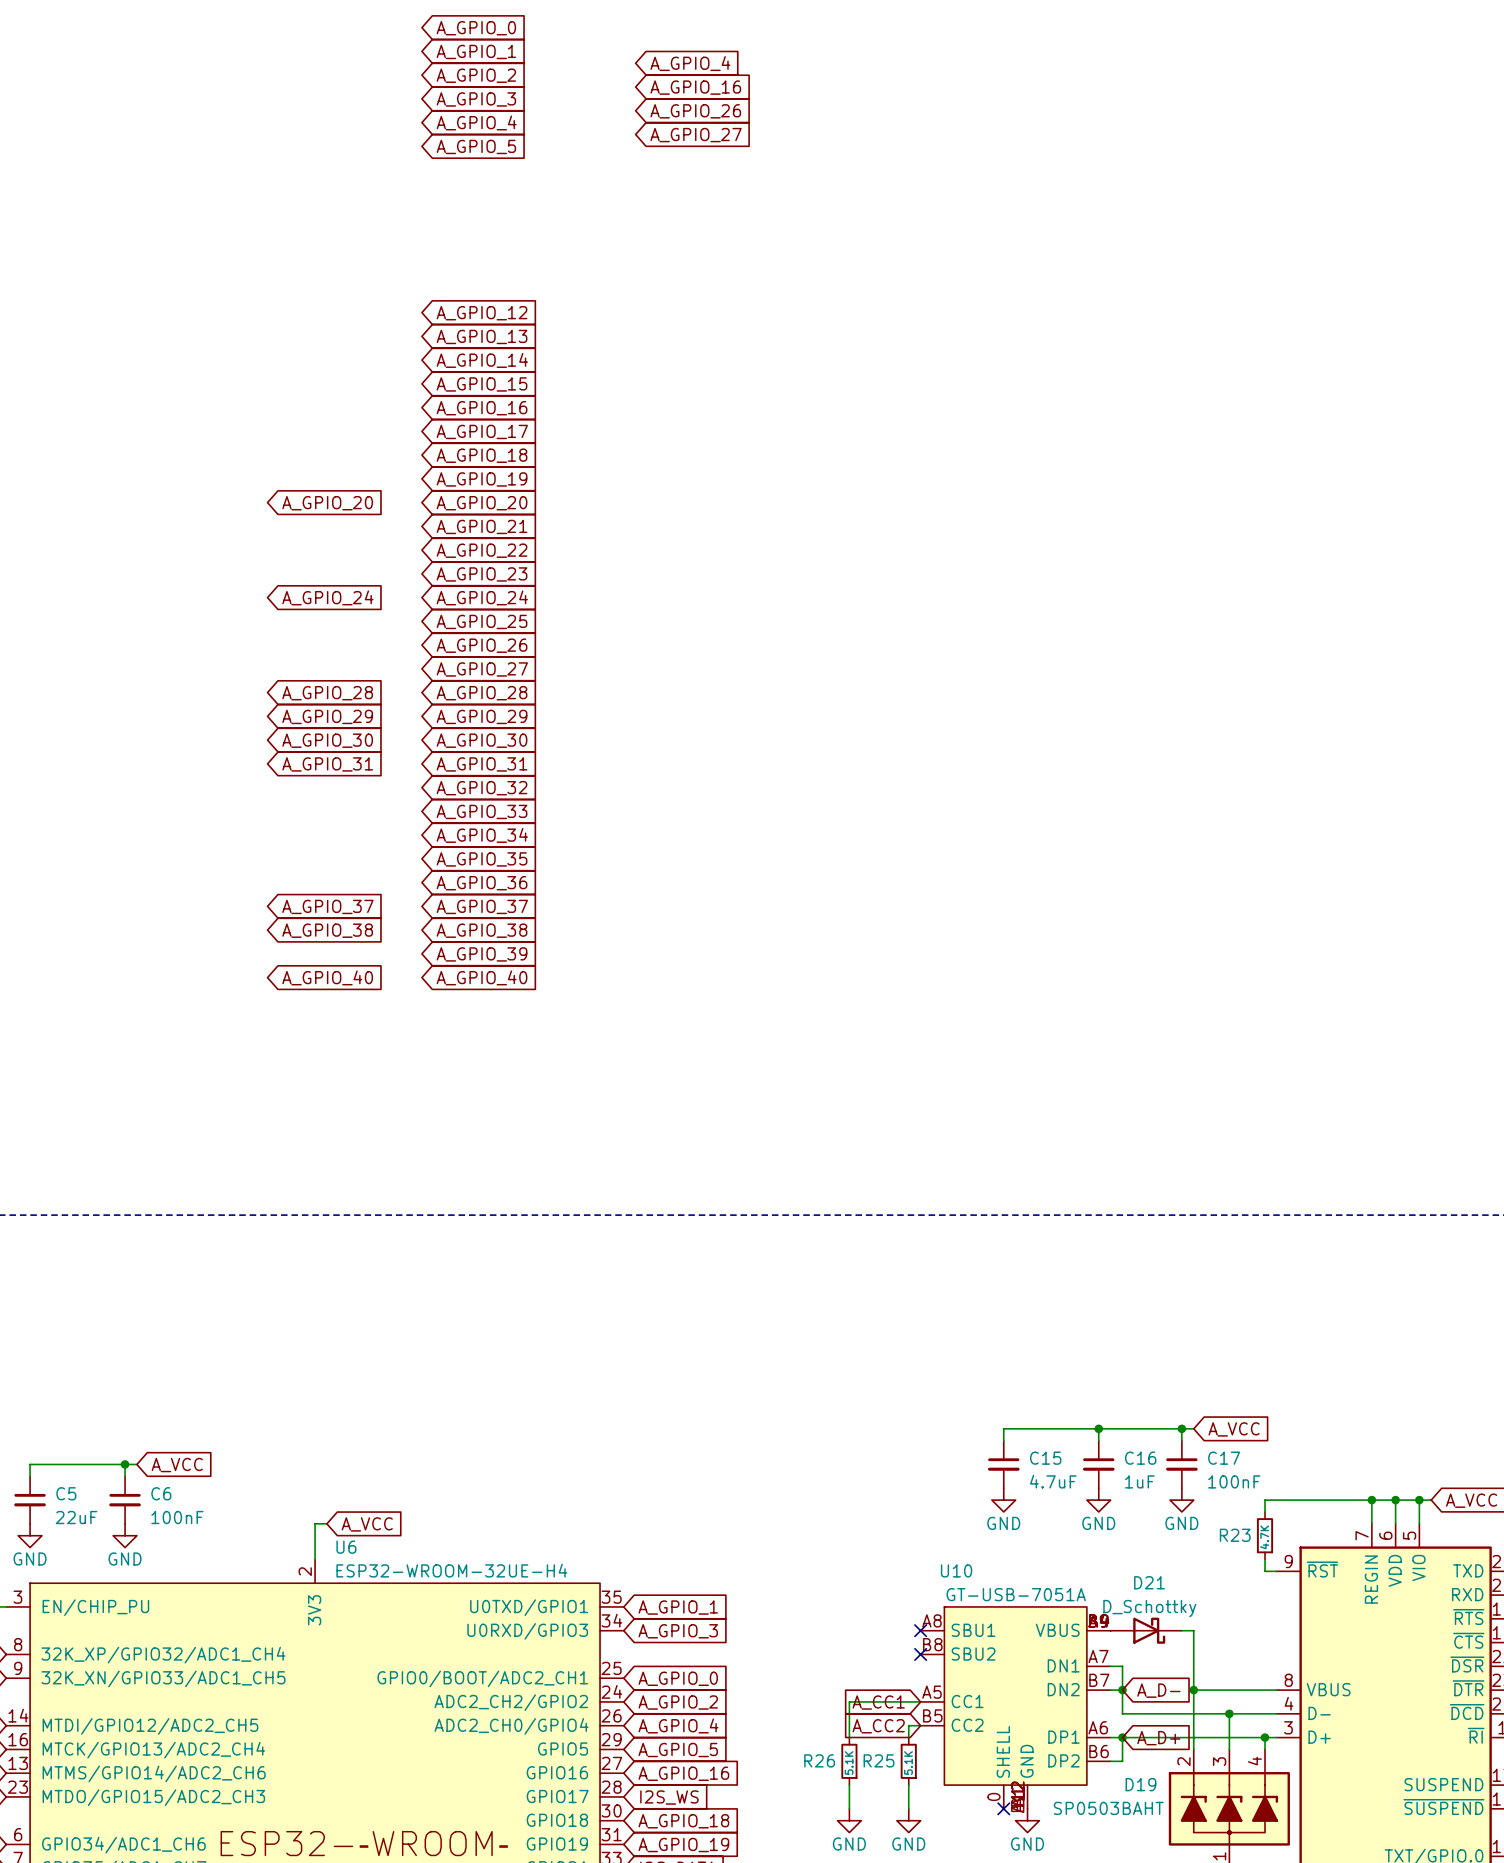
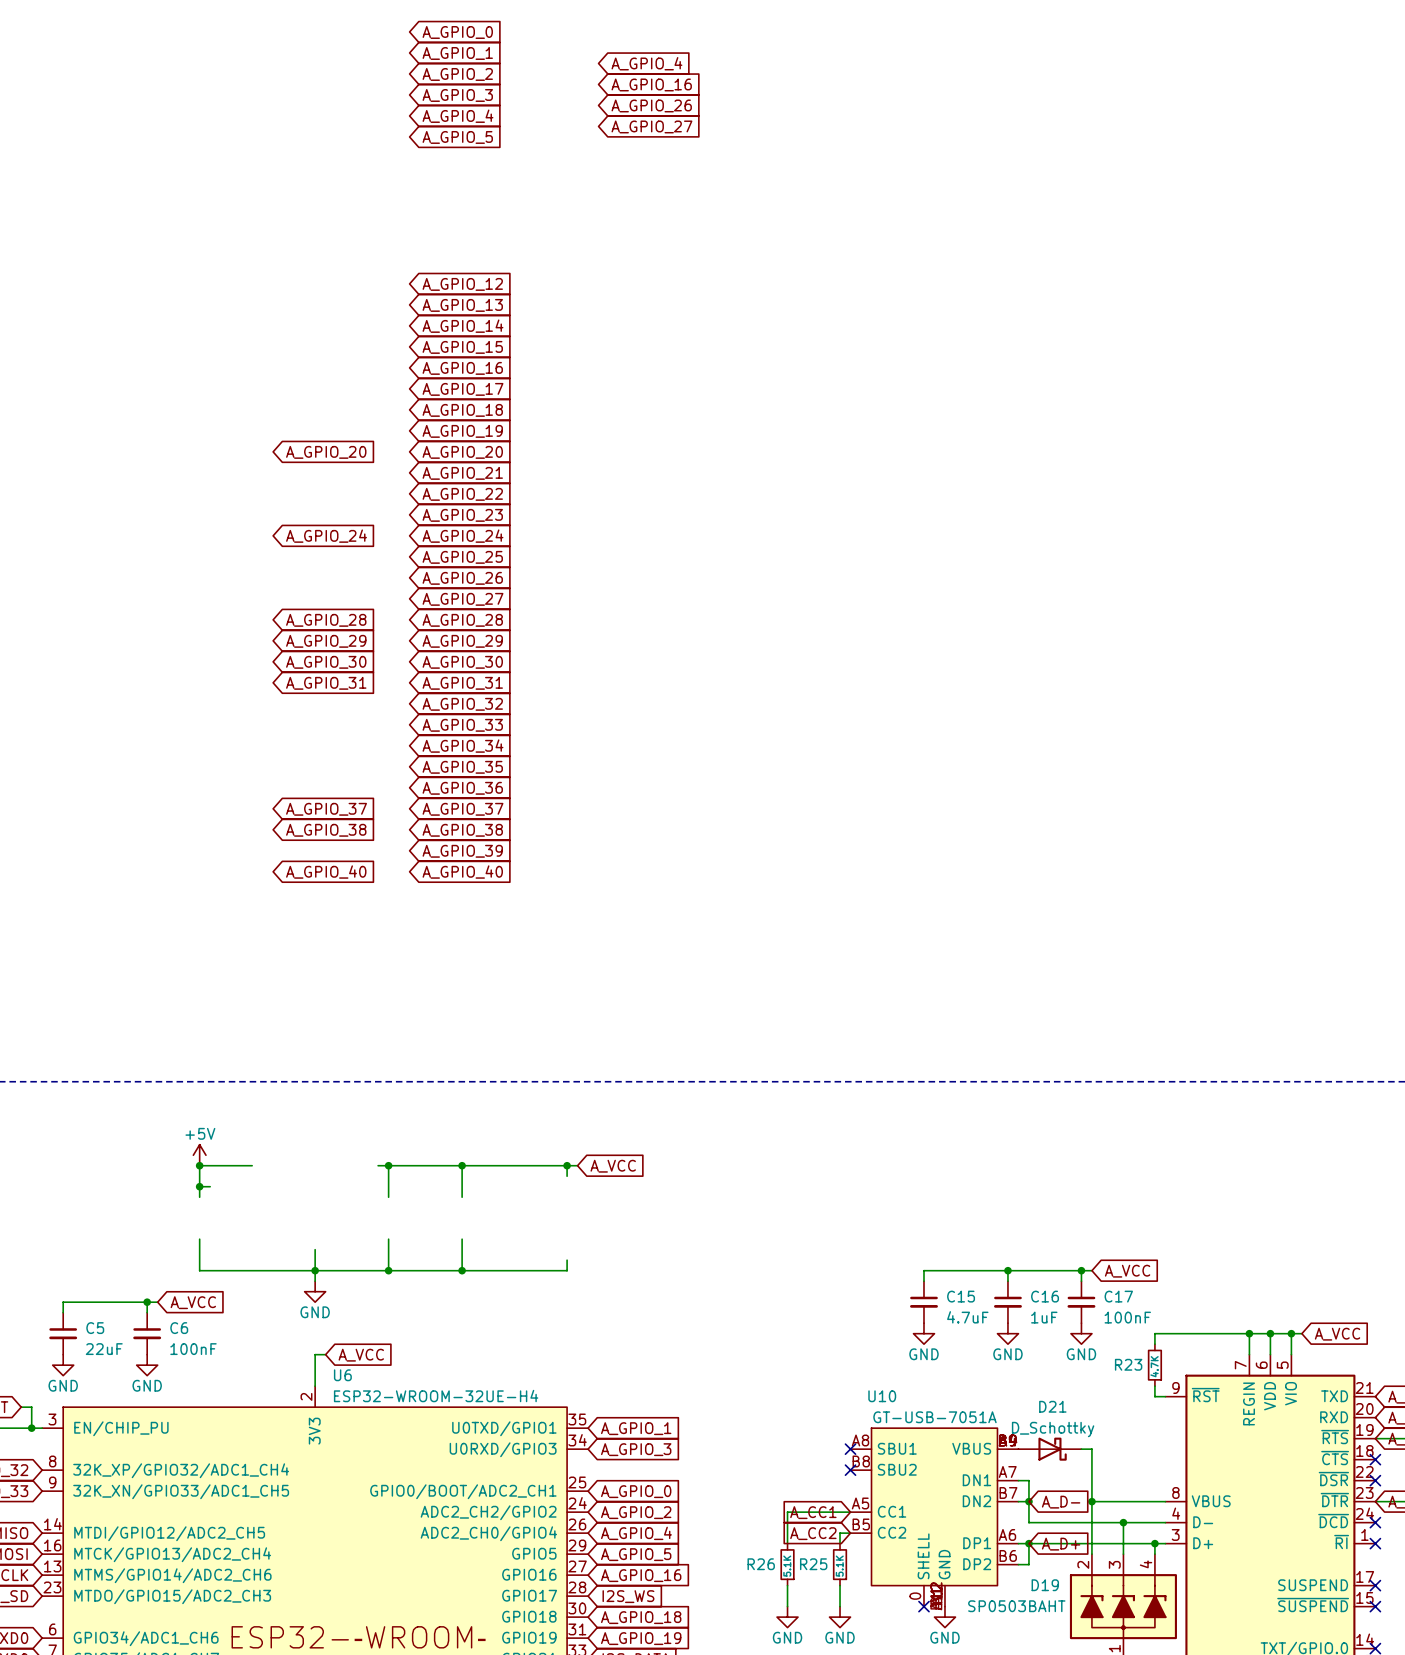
power symbol: none -> +5V (199, 1155)
junction: none -> (199, 1165)
wire: none -> (252, 1165) (199, 1165) (199, 1197)
wire: none -> (378, 1165) (577, 1165)
wire: none -> (388, 1165) (388, 1197)
junction: none -> (388, 1165)
wire: none -> (462, 1165) (462, 1197)
junction: none -> (462, 1165)
wire: none -> (567, 1165) (567, 1176)
junction: none -> (567, 1165)
global label: none -> A_VCC (613, 1166)
wire: none -> (199, 1186) (210, 1186)
junction: none -> (199, 1186)
wire: none -> (199, 1239) (199, 1270) (567, 1270) (567, 1260)
wire: none -> (388, 1239) (388, 1270)
wire: none -> (462, 1239) (462, 1270)
wire: none -> (315, 1249) (315, 1281)
junction: none -> (315, 1270)
junction: none -> (388, 1270)
junction: none -> (462, 1270)
power symbol: none -> GND (315, 1291)

